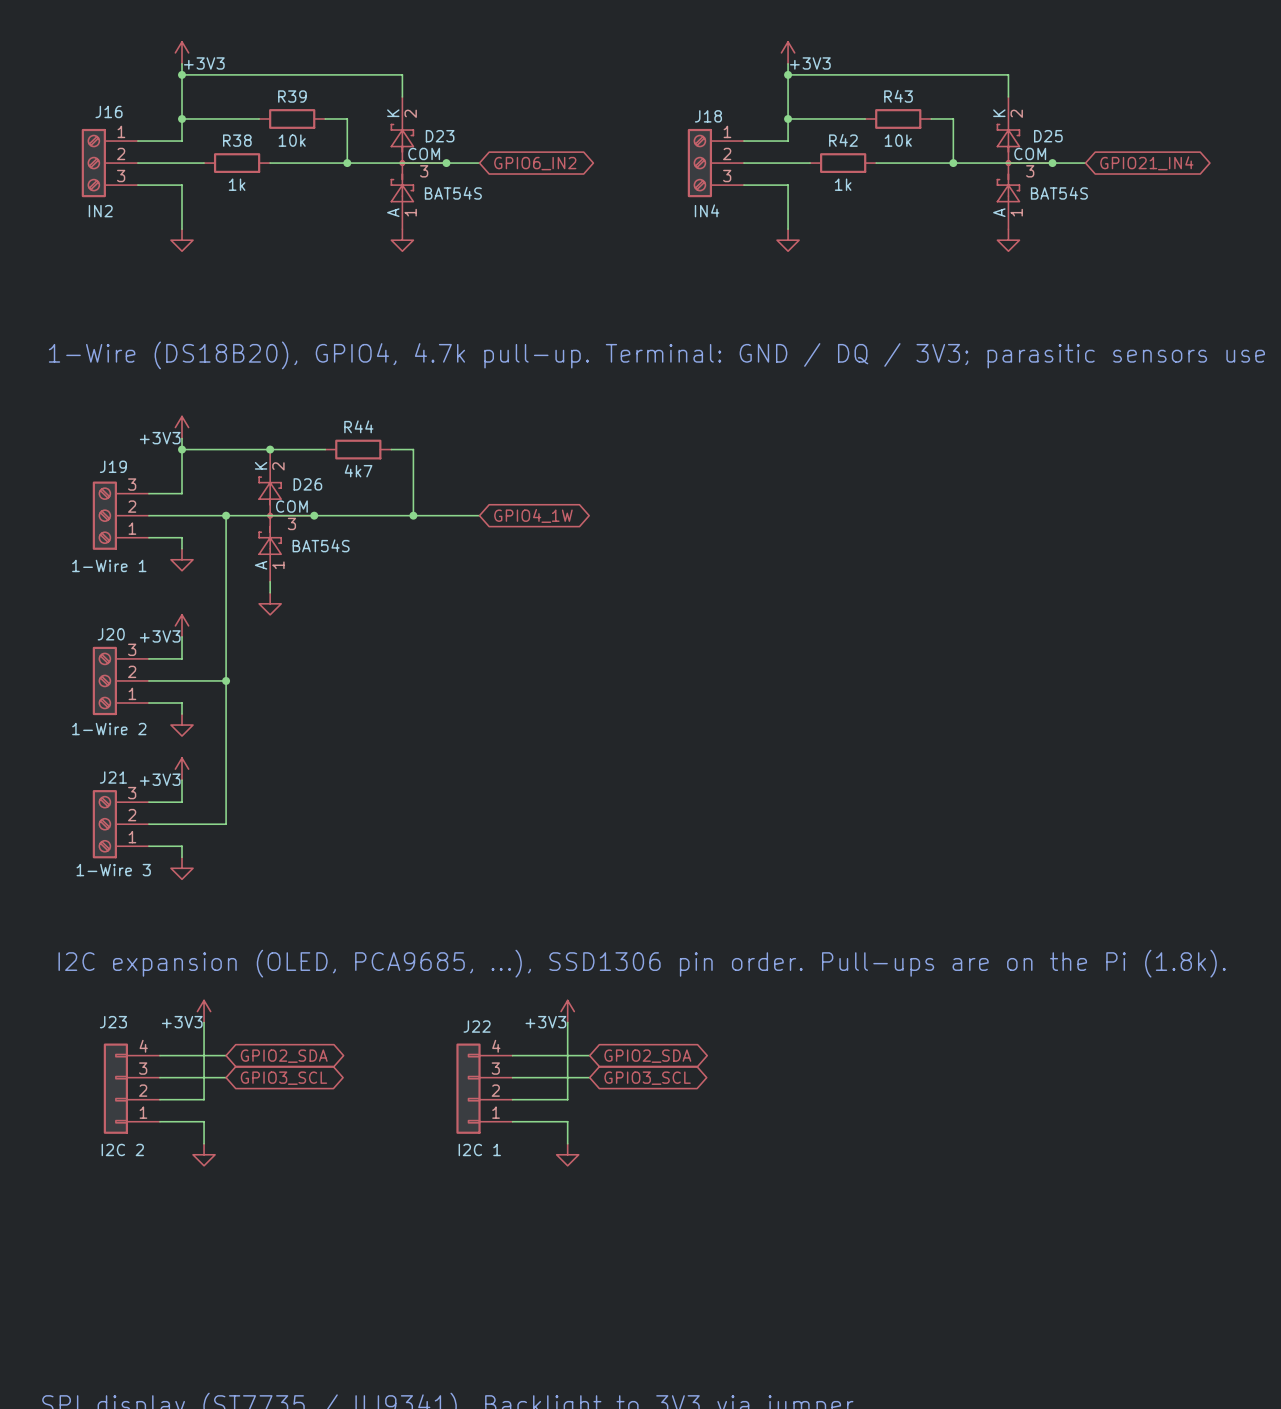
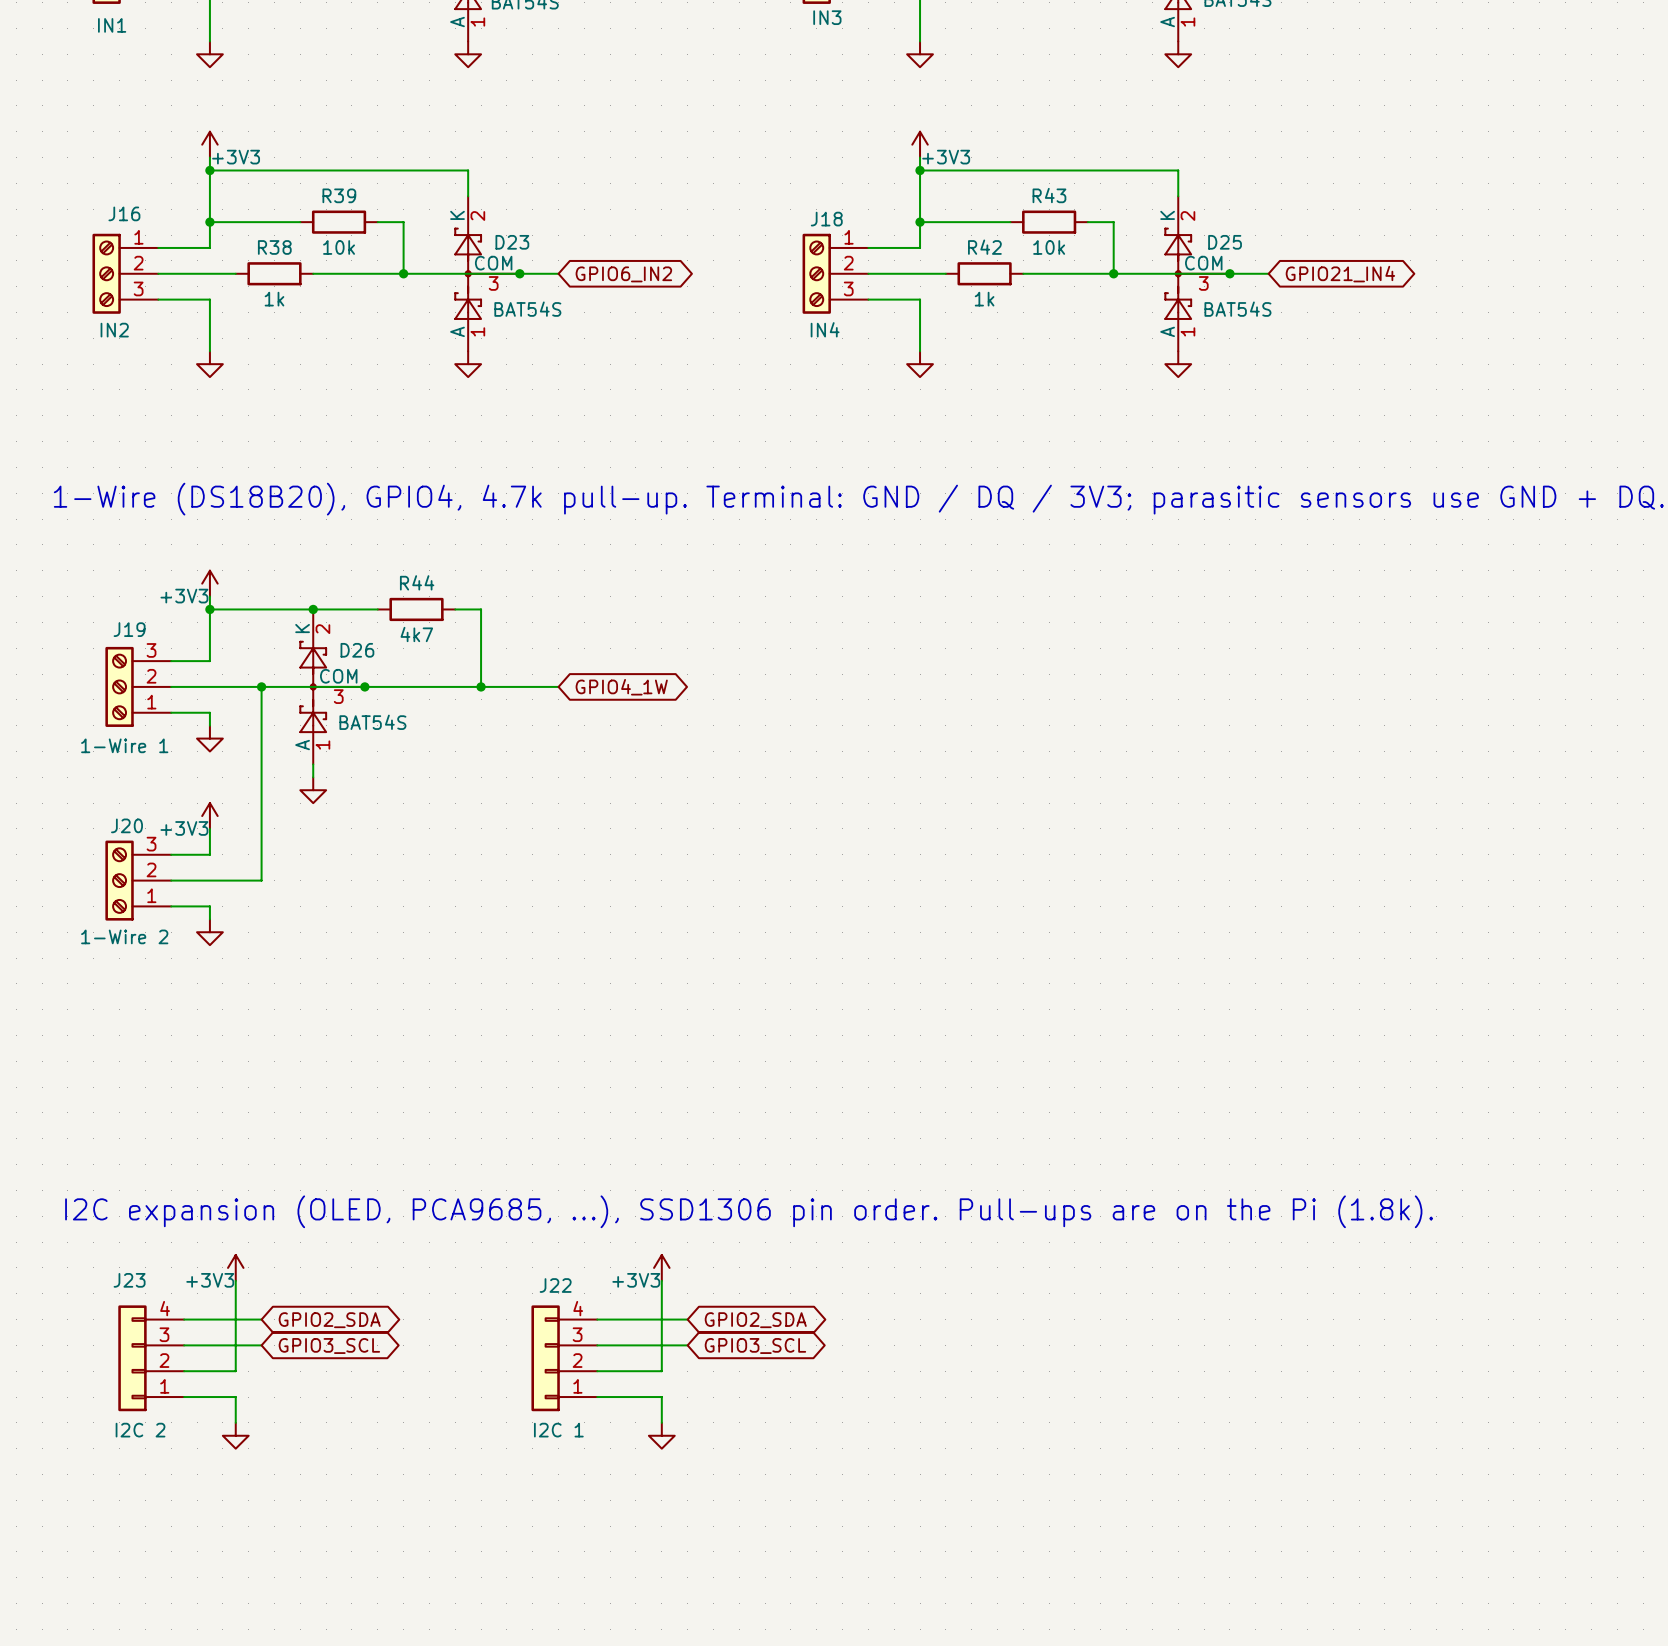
wire: (226, 680) (226, 824) (148, 824) -> none
junction: (226, 680) -> none
power symbol: +3V3 (182, 769) -> none
wire: (182, 780) (182, 802) (148, 802) -> none
J21: 1-Wire 3 (120, 824) -> none
wire: (148, 846) (182, 846) (182, 857) -> none
power symbol: (182, 868) -> none

